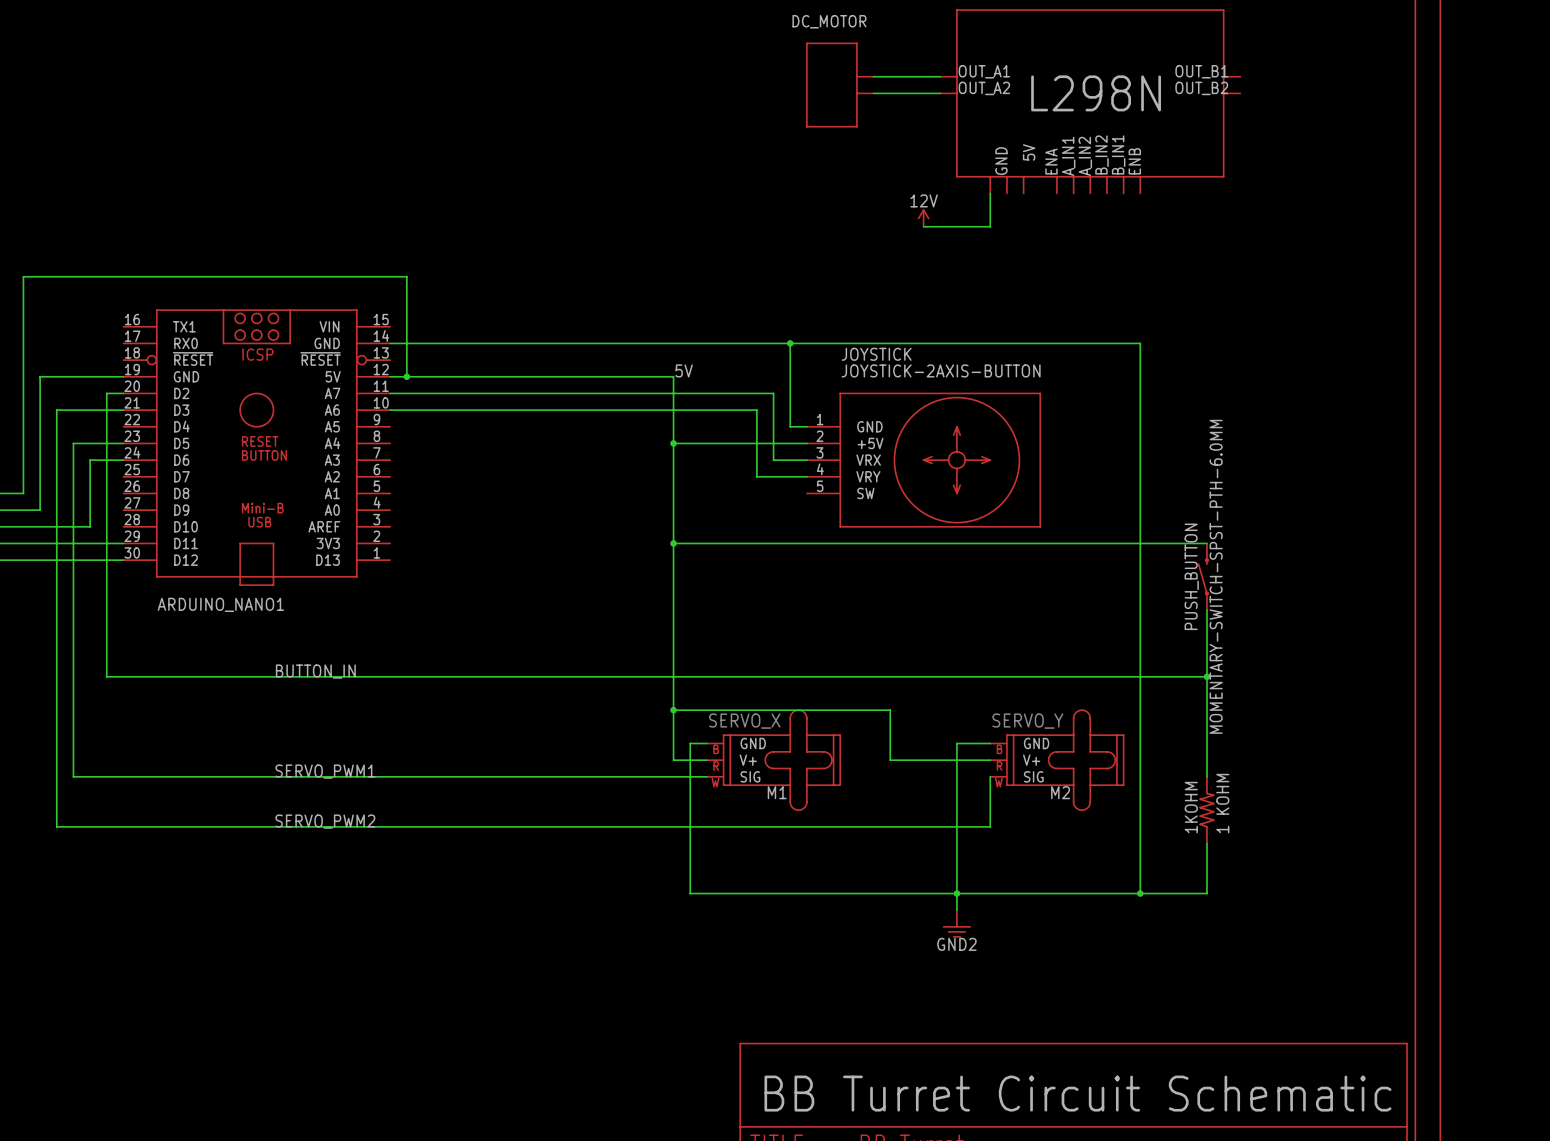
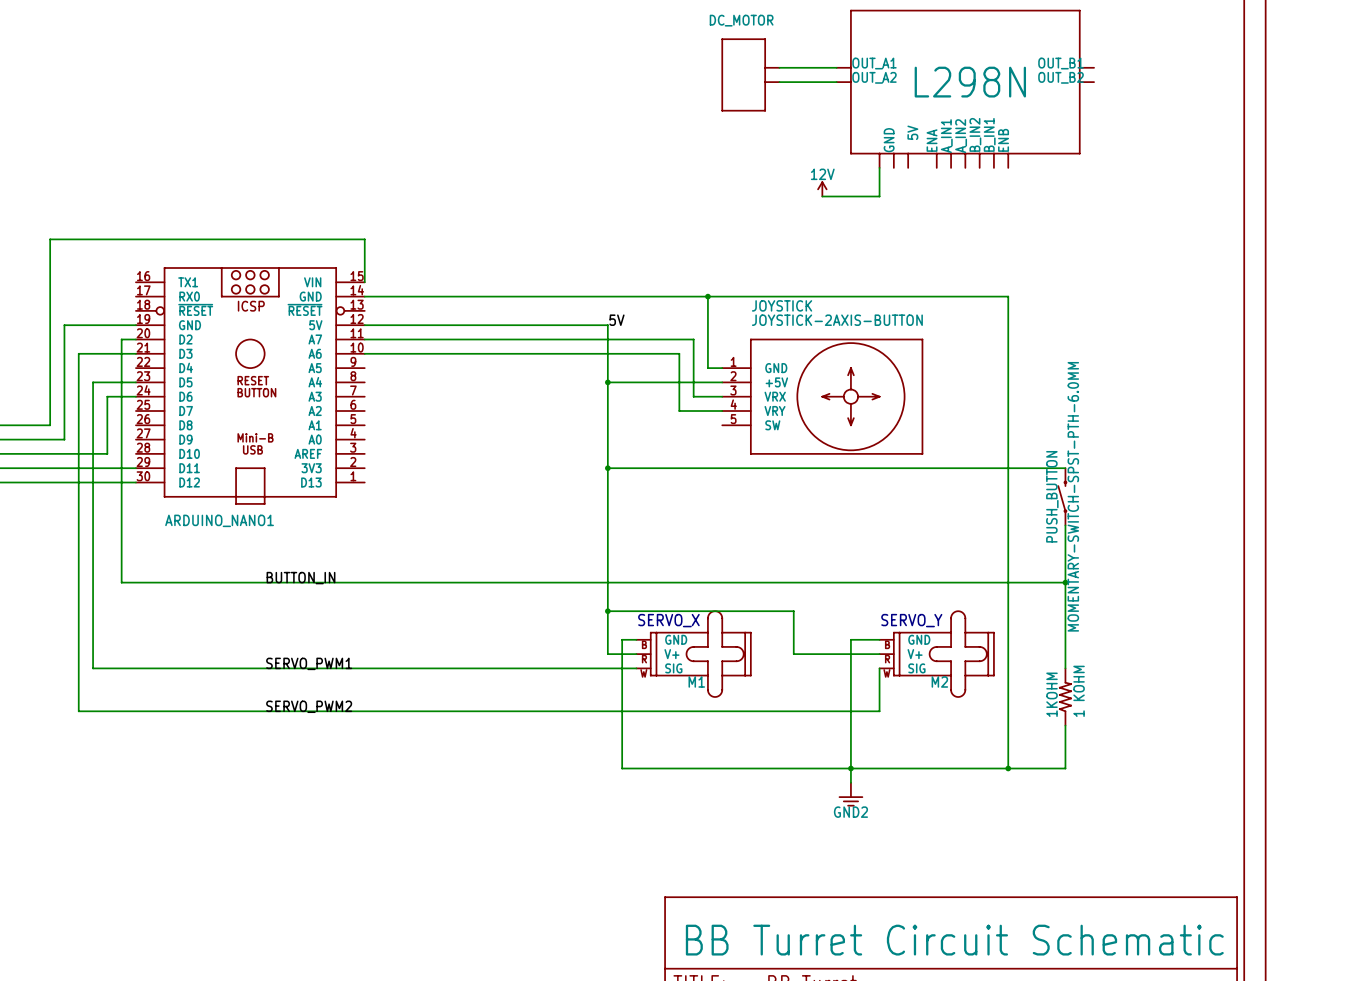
wire: (390, 276) (406, 276) (406, 376) -> (364, 239) (364, 282)
junction: (406, 376) -> none

